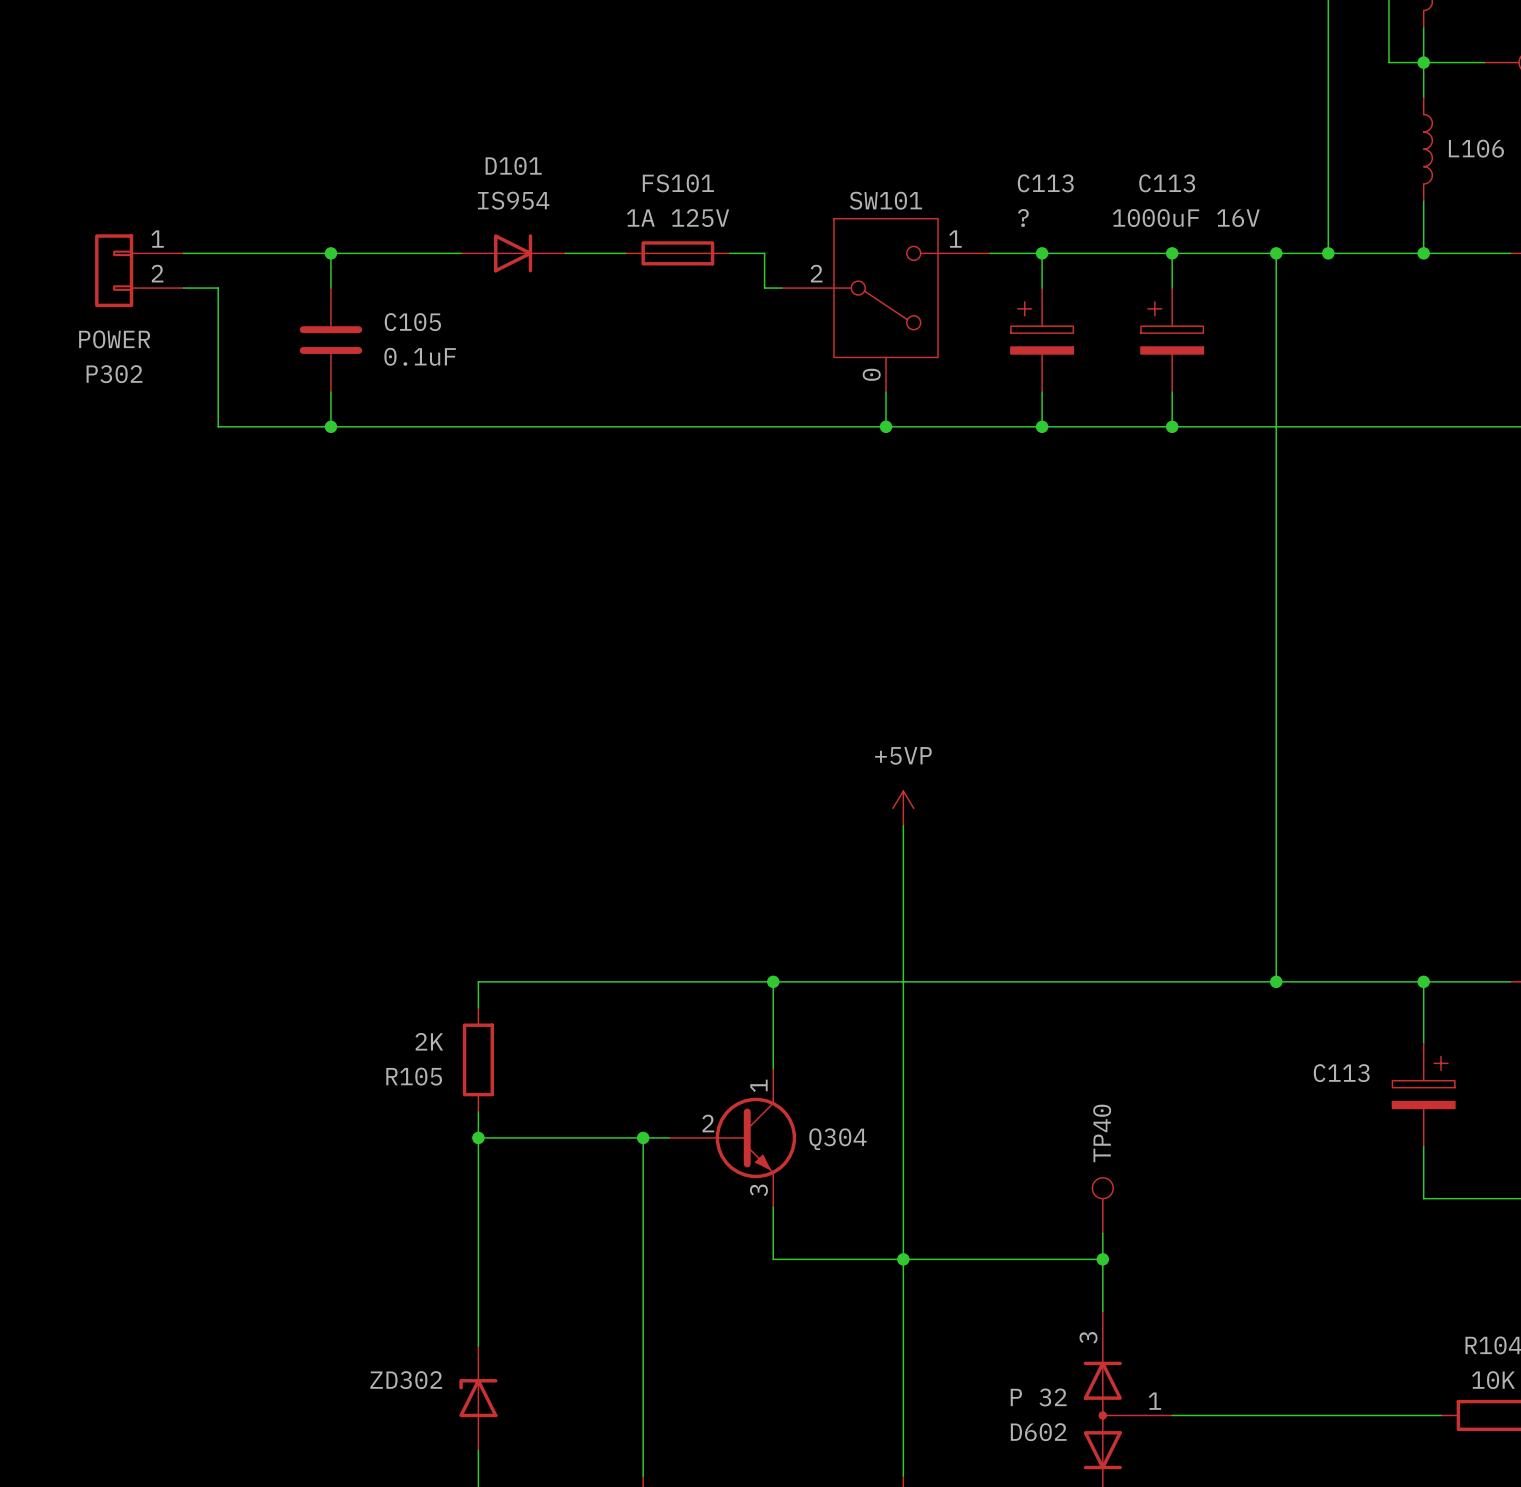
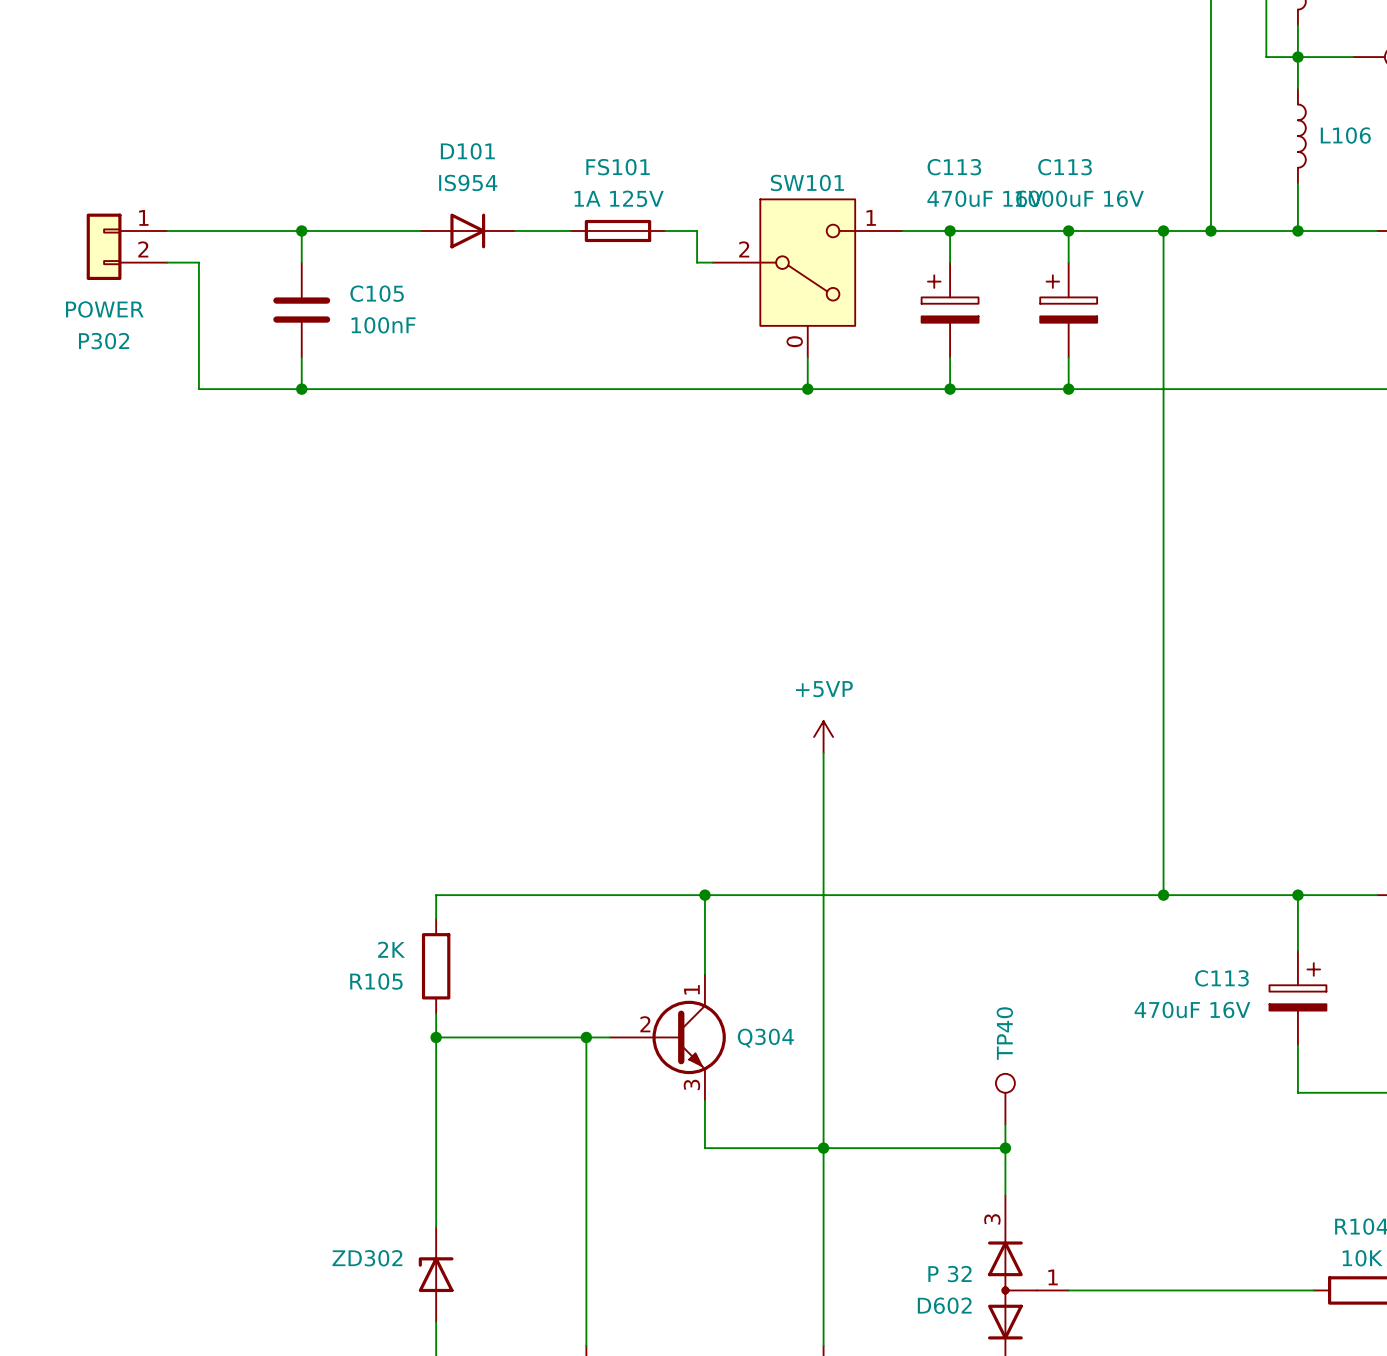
C113 value: ? (1023, 217) -> 470uF 16V (985, 198)
C105 value: 0.1uF (420, 356) -> 100nF (383, 325)
C113 value: none -> 470uF 16V (1192, 1009)

